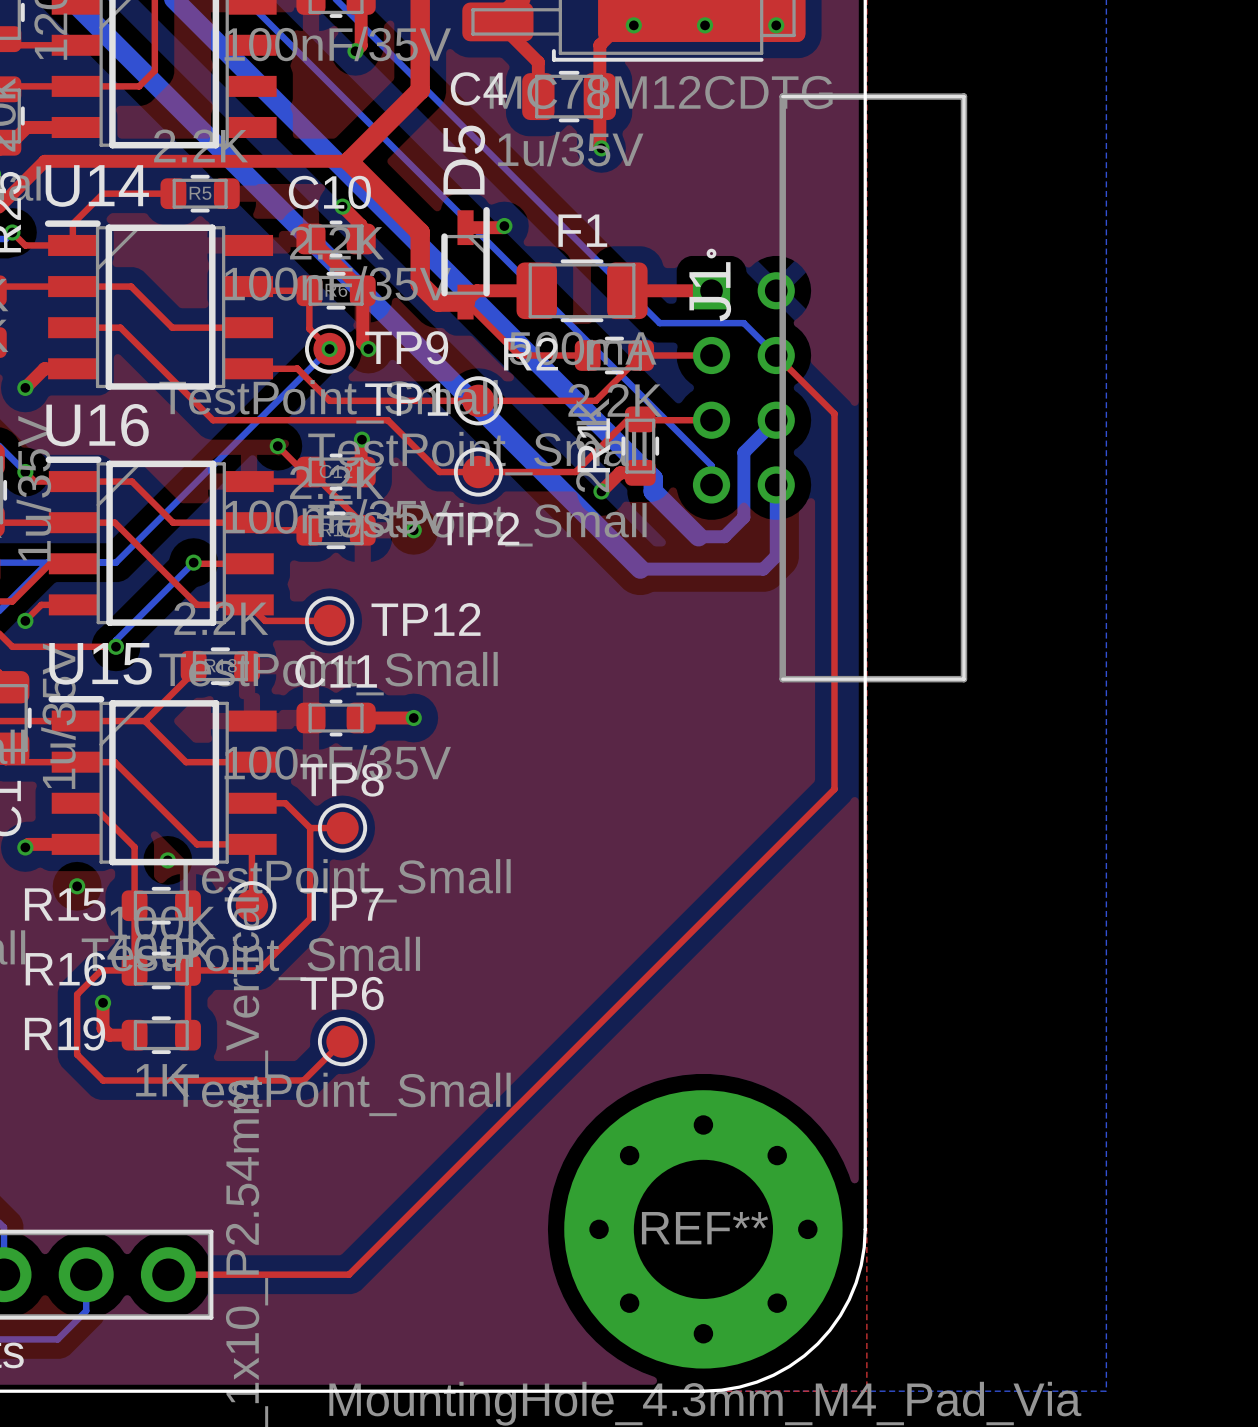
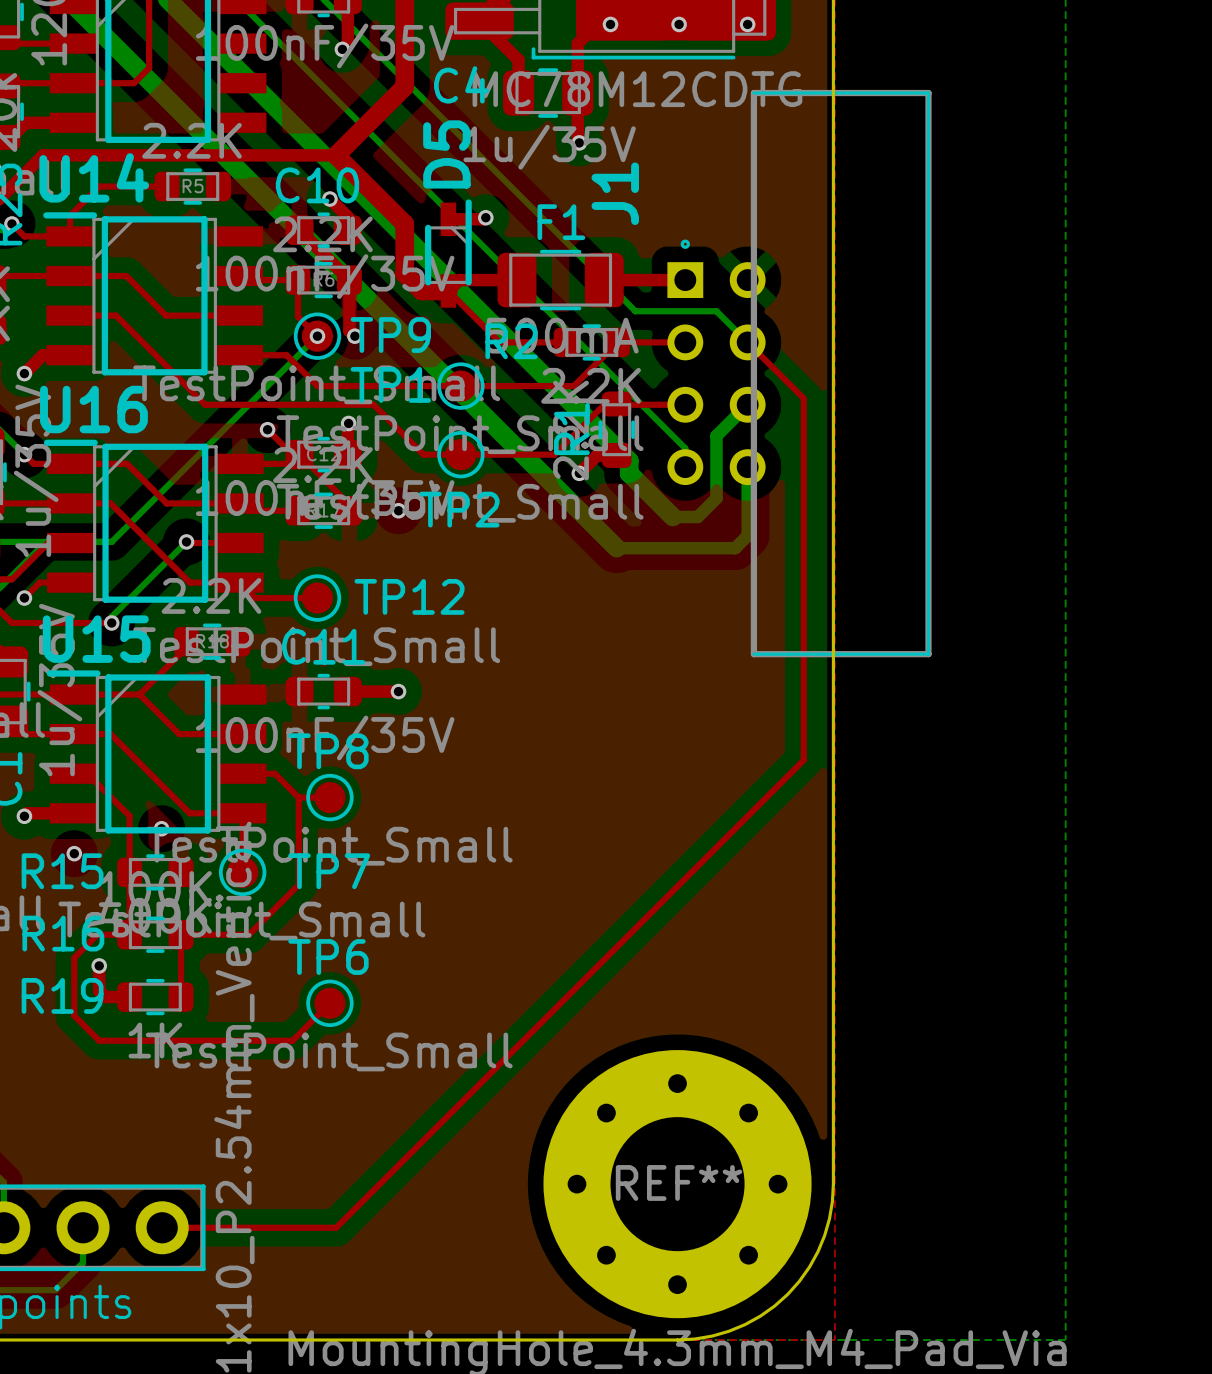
J1 name position: J1 (710, 291) -> J1 (615, 193)

